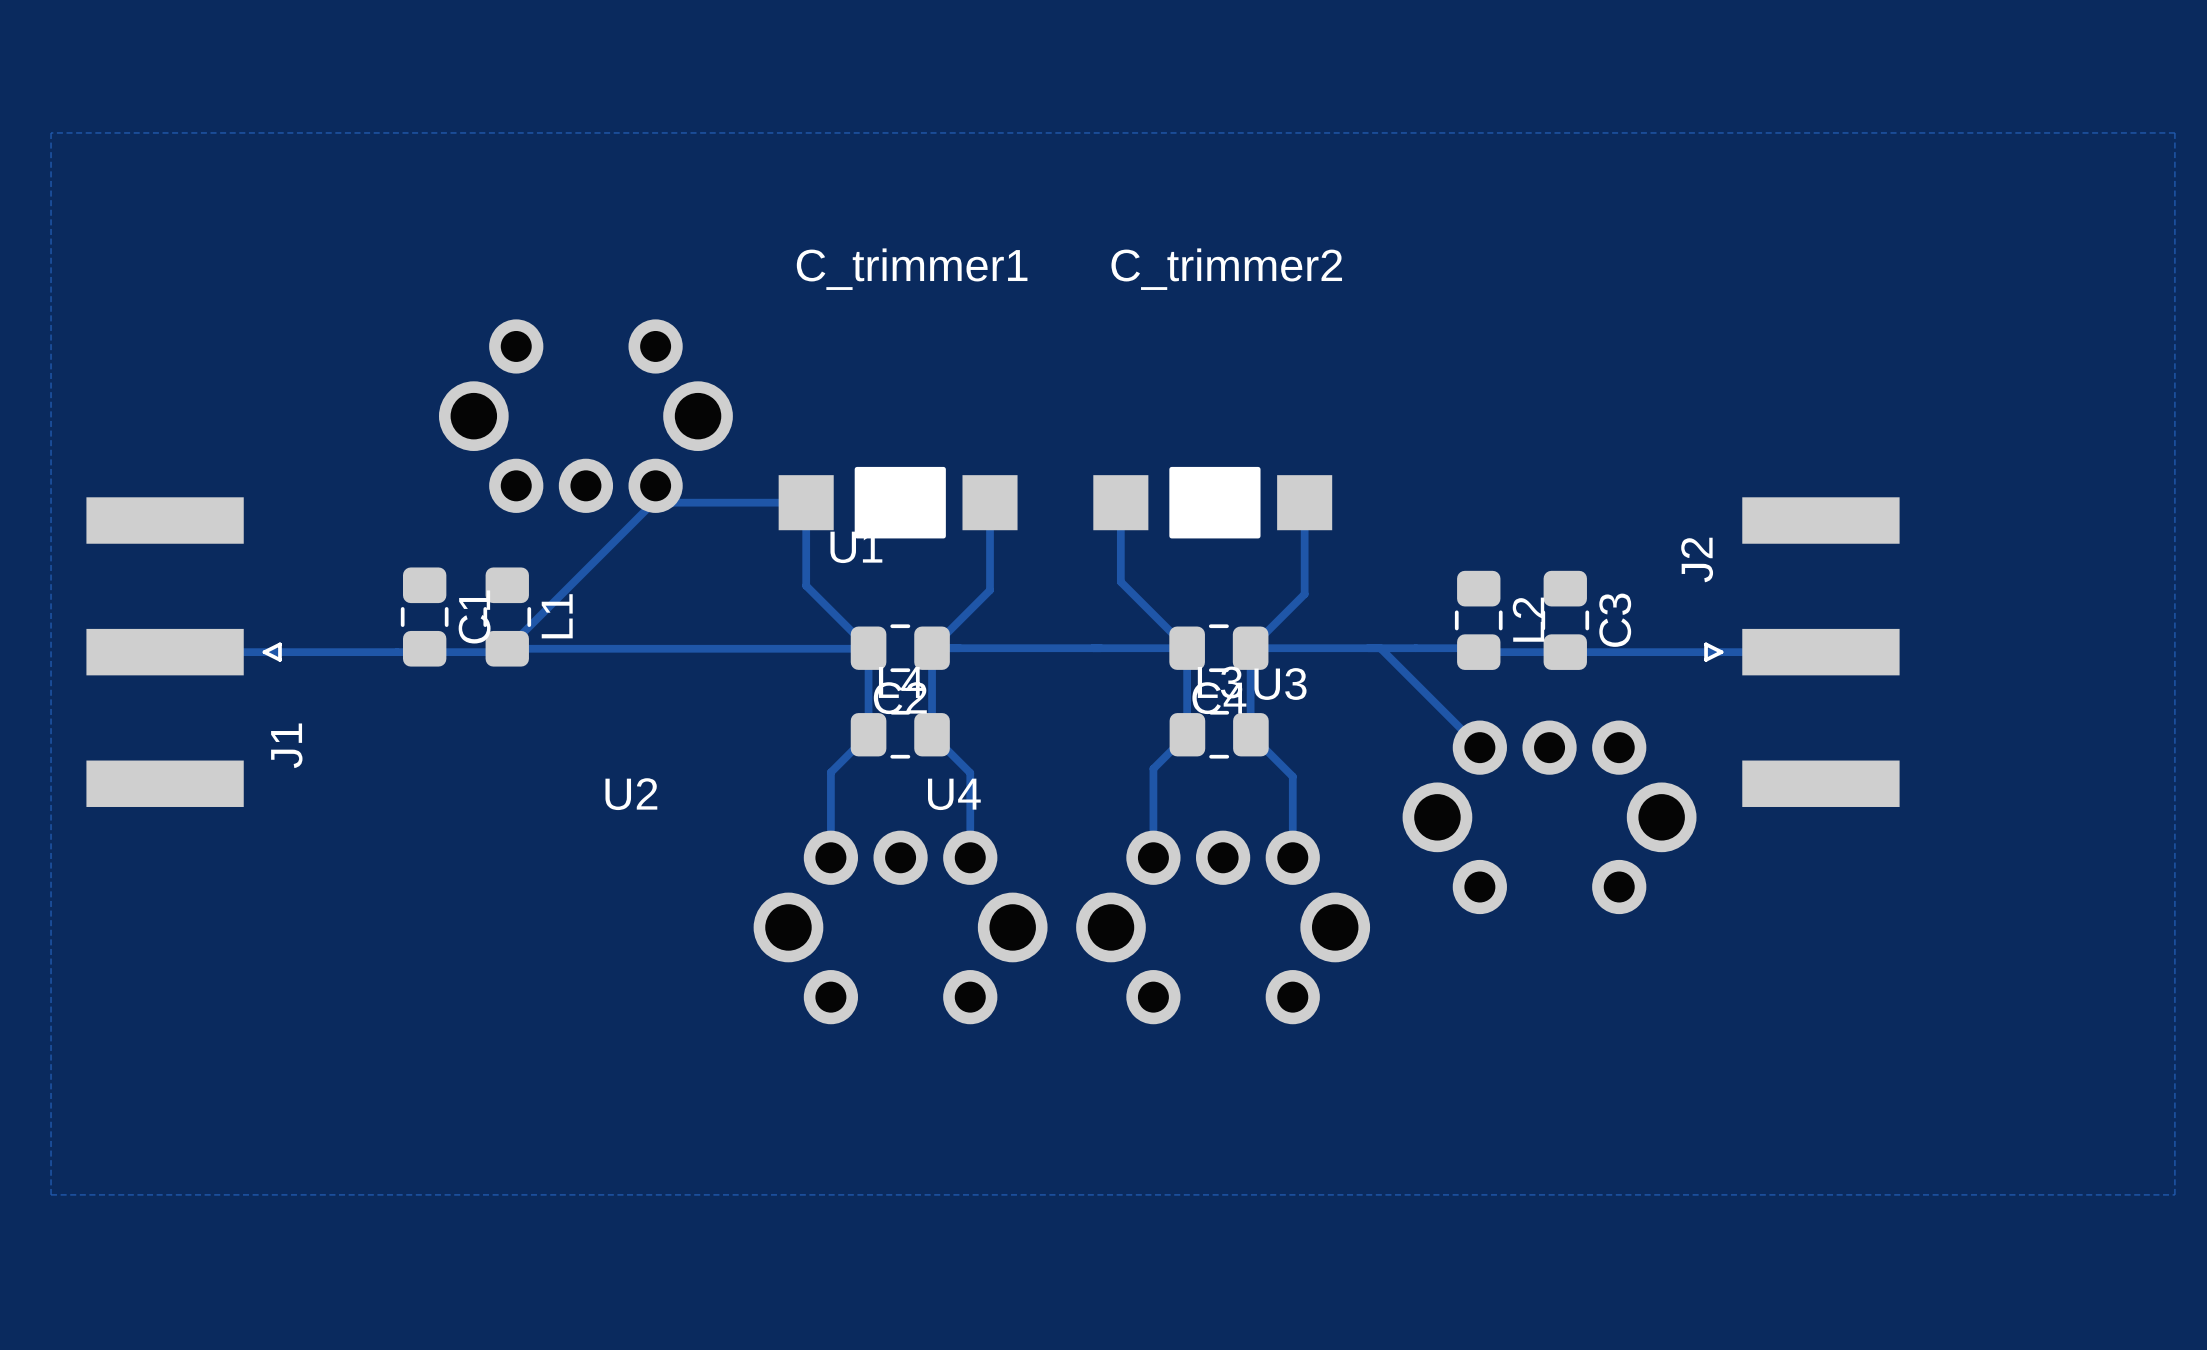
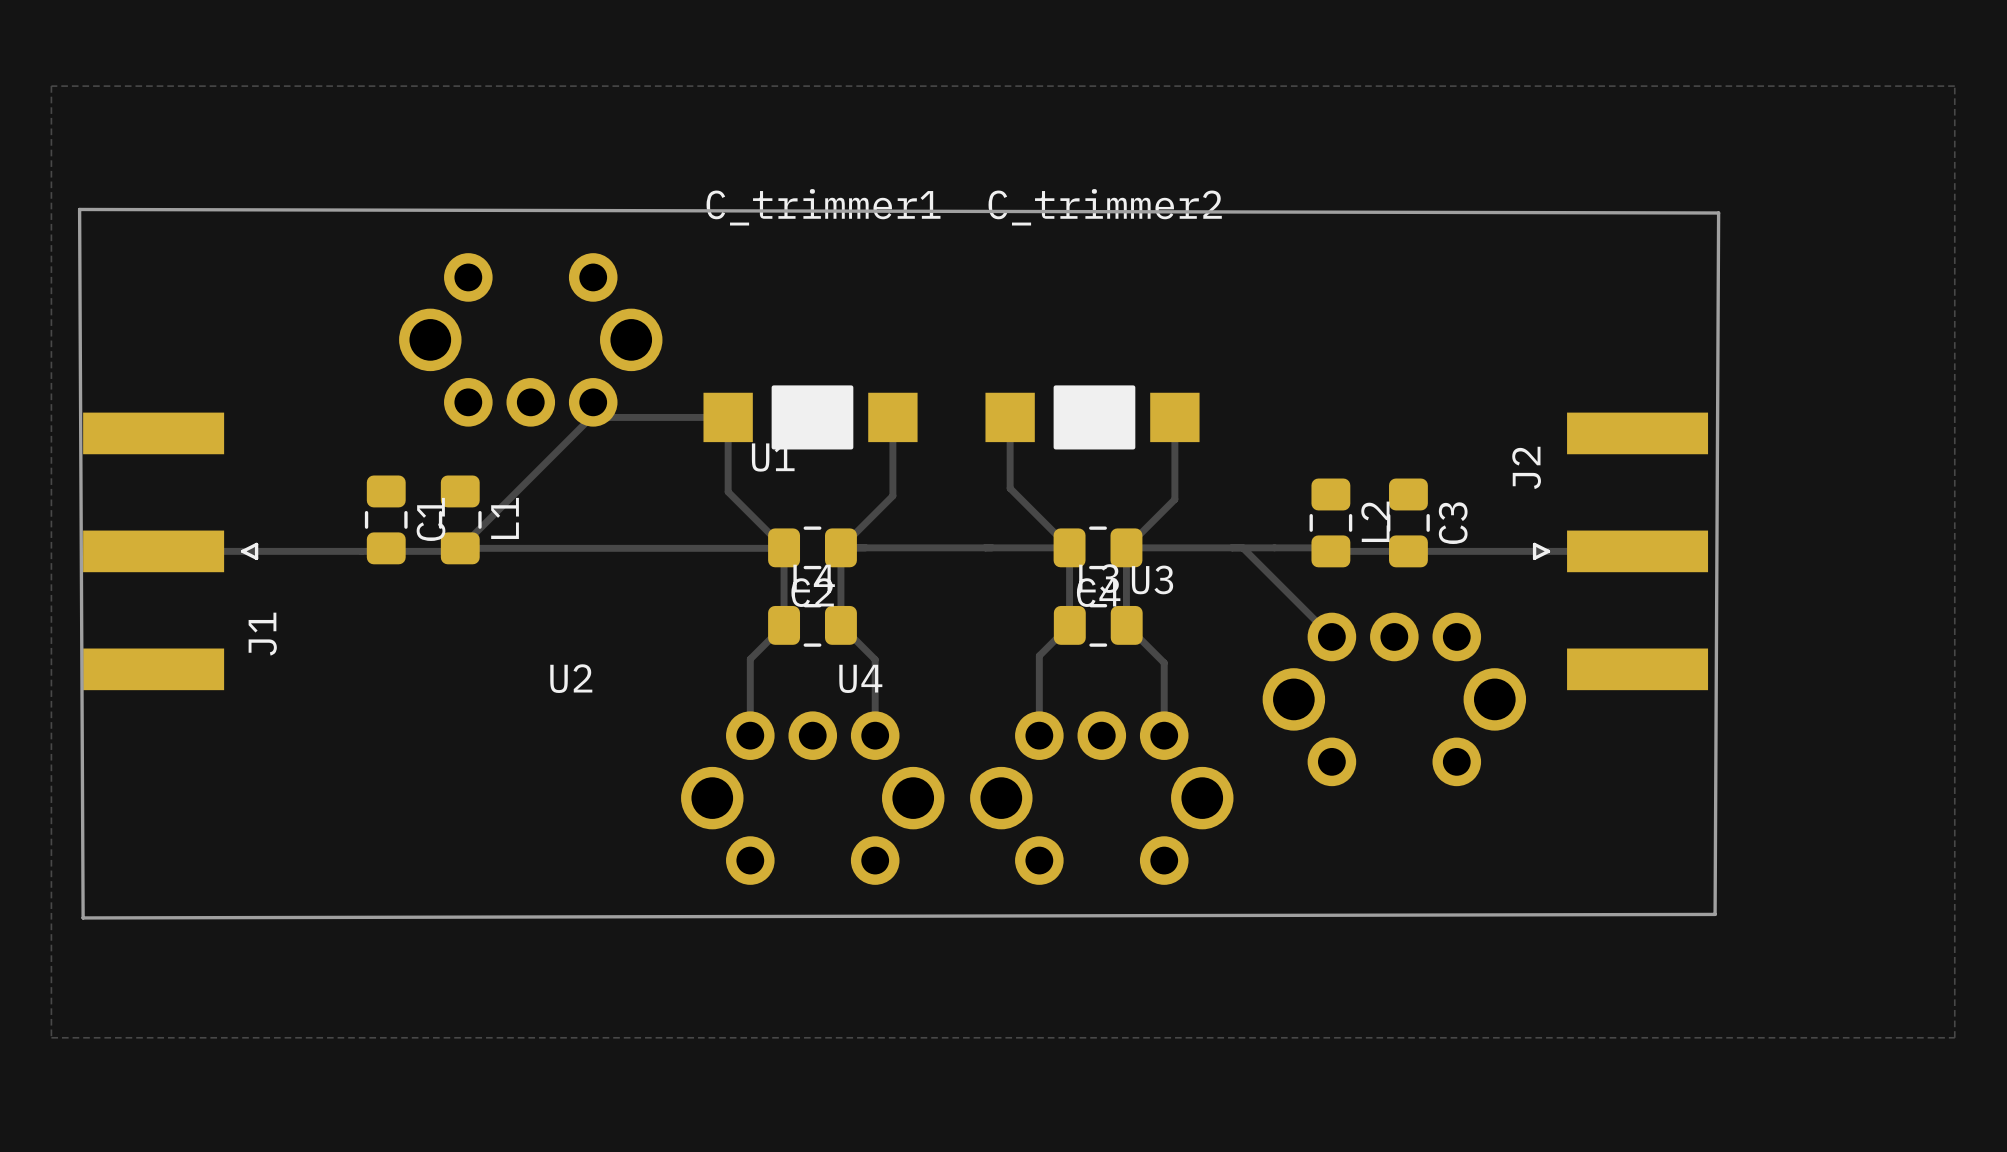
board edge: none -> (79, 209) (1718, 213) (1715, 914) (83, 917) (79, 209)

